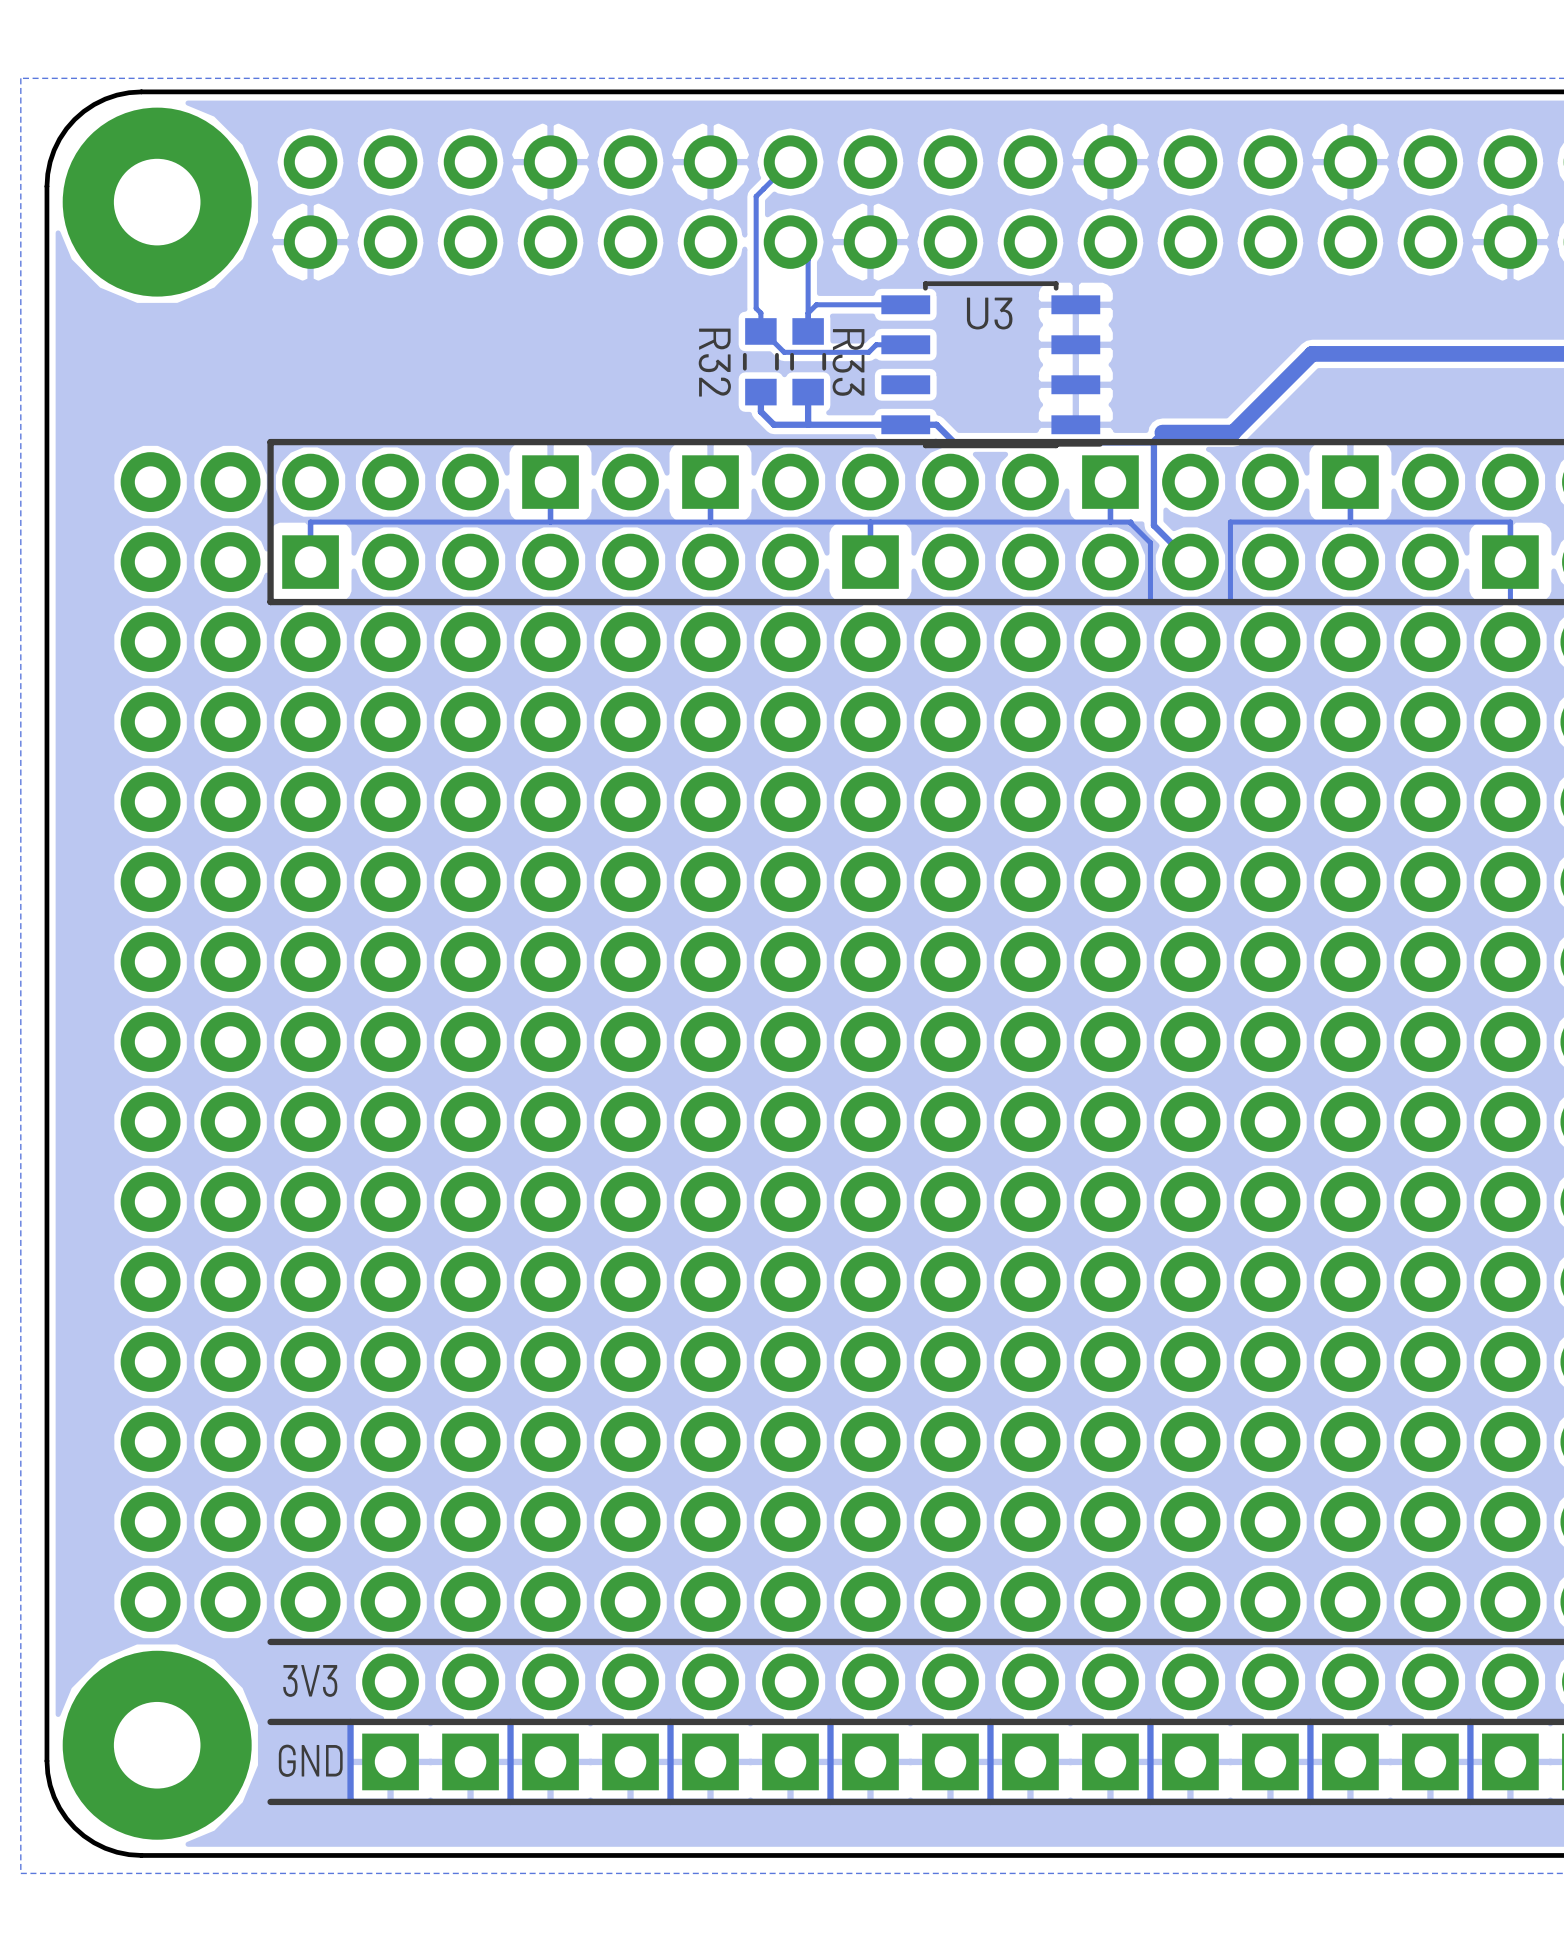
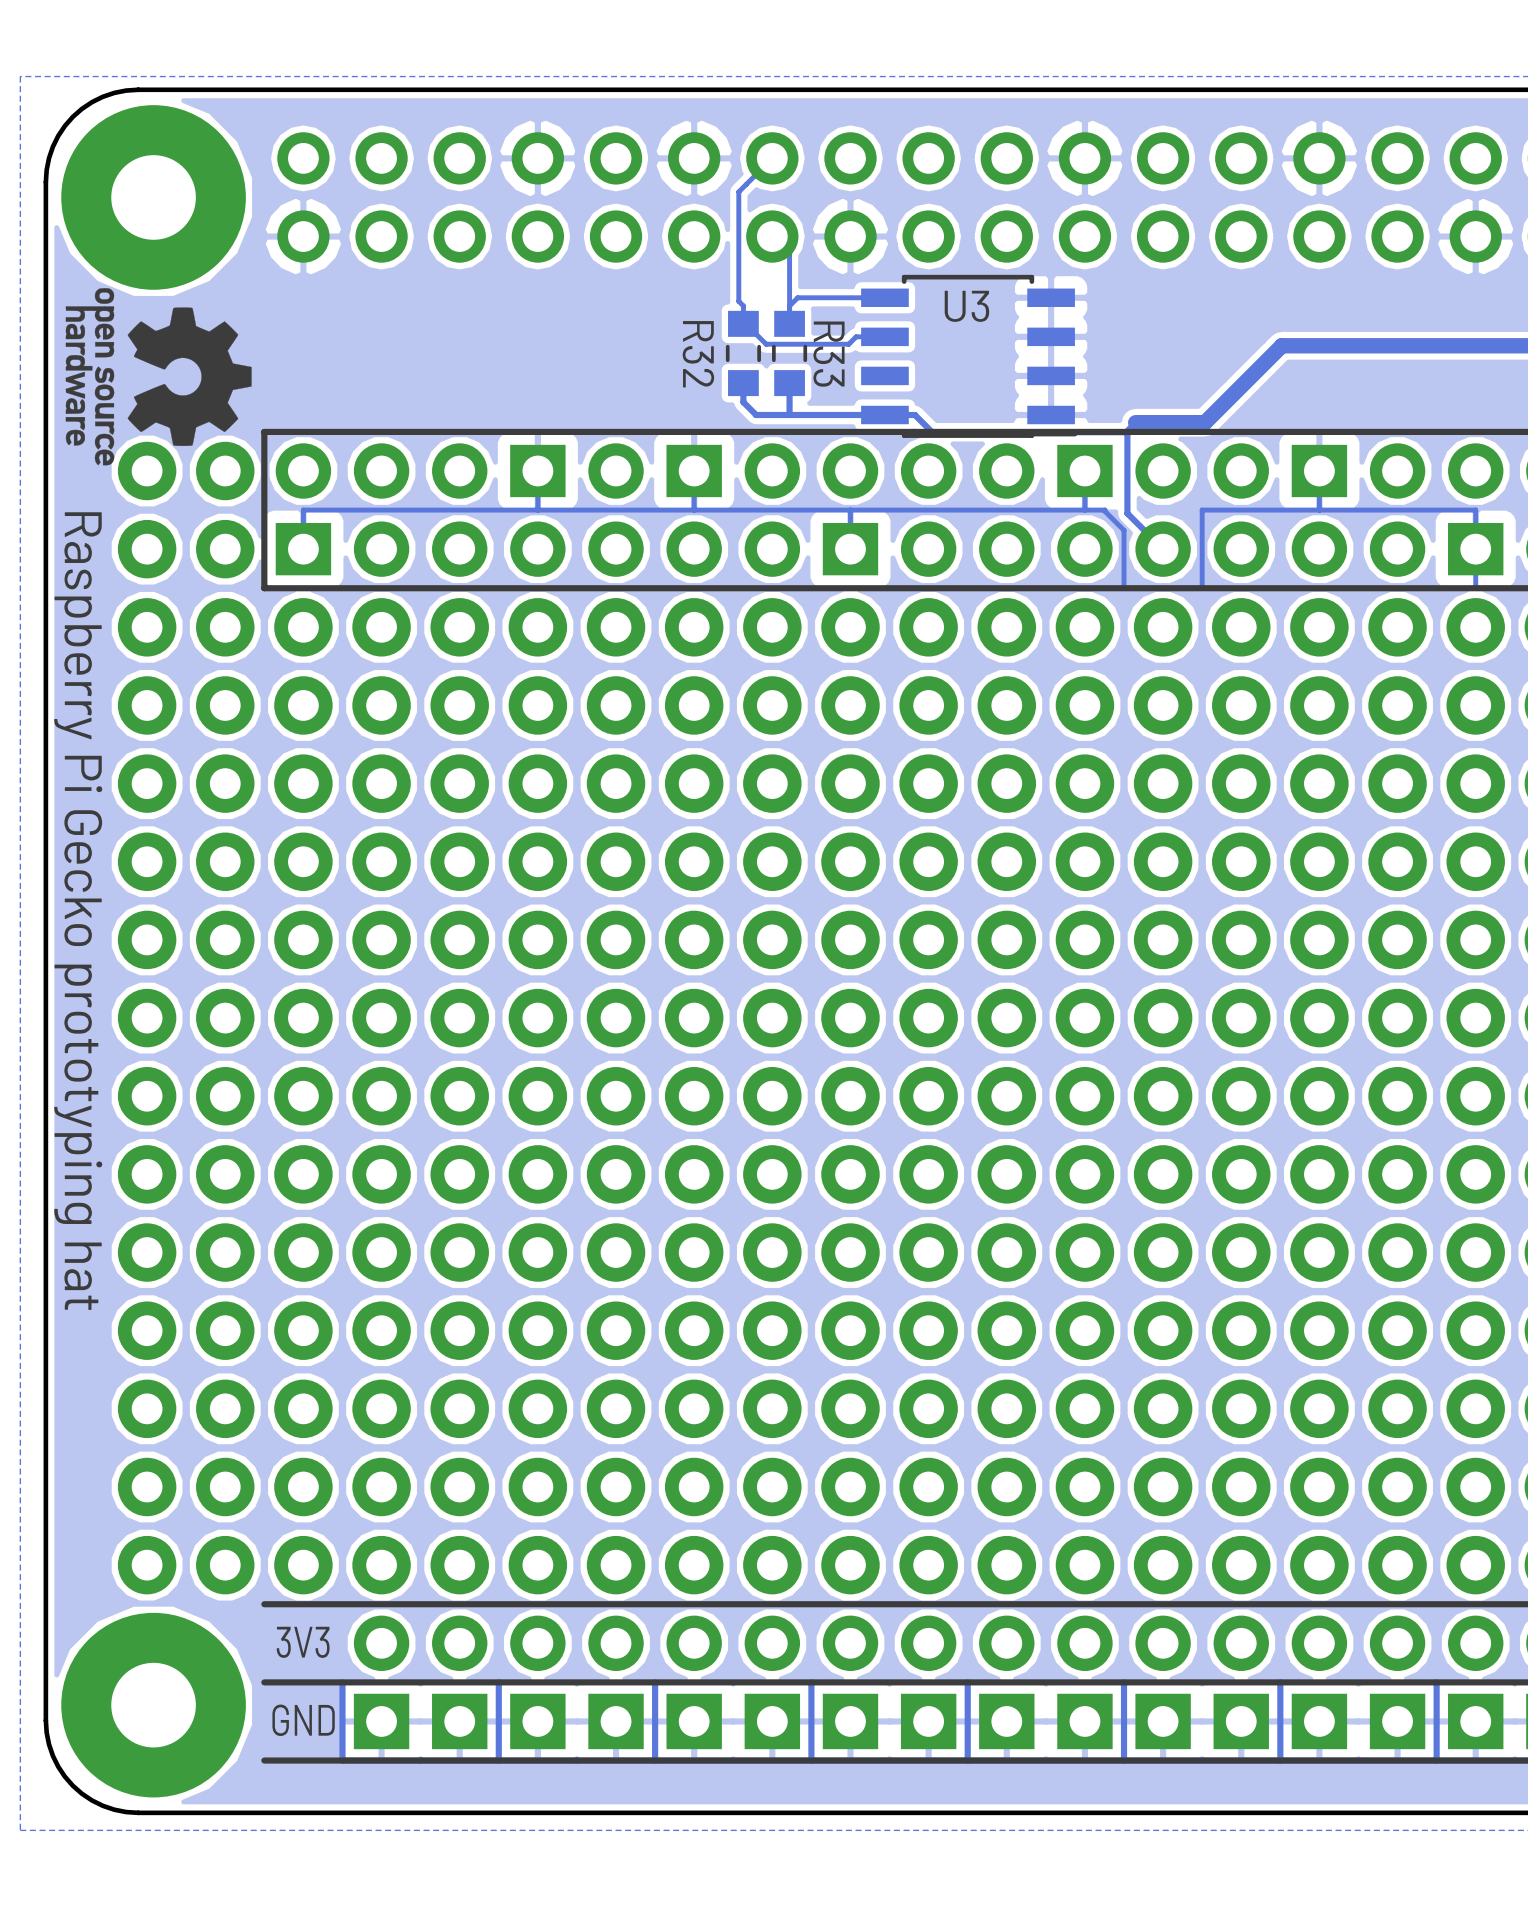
drawing: none -> [65, 288, 252, 466]
text: none -> Raspberry Pi Gecko prototyping hat (78, 911)

